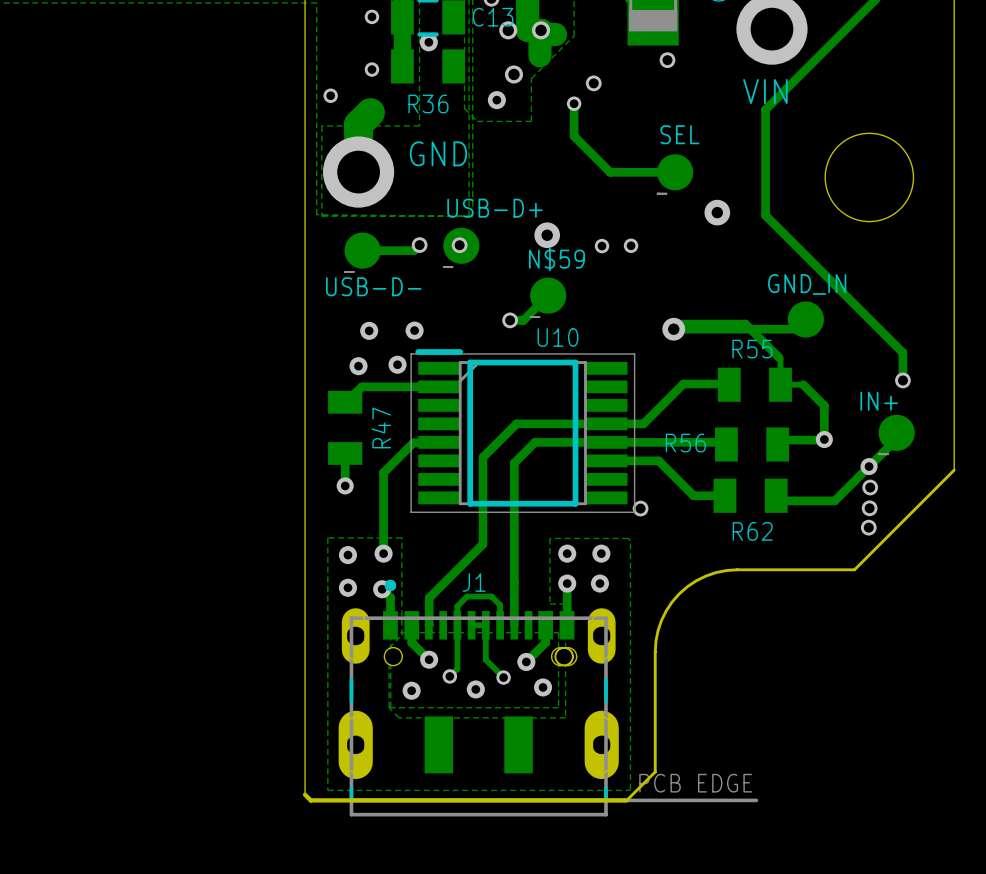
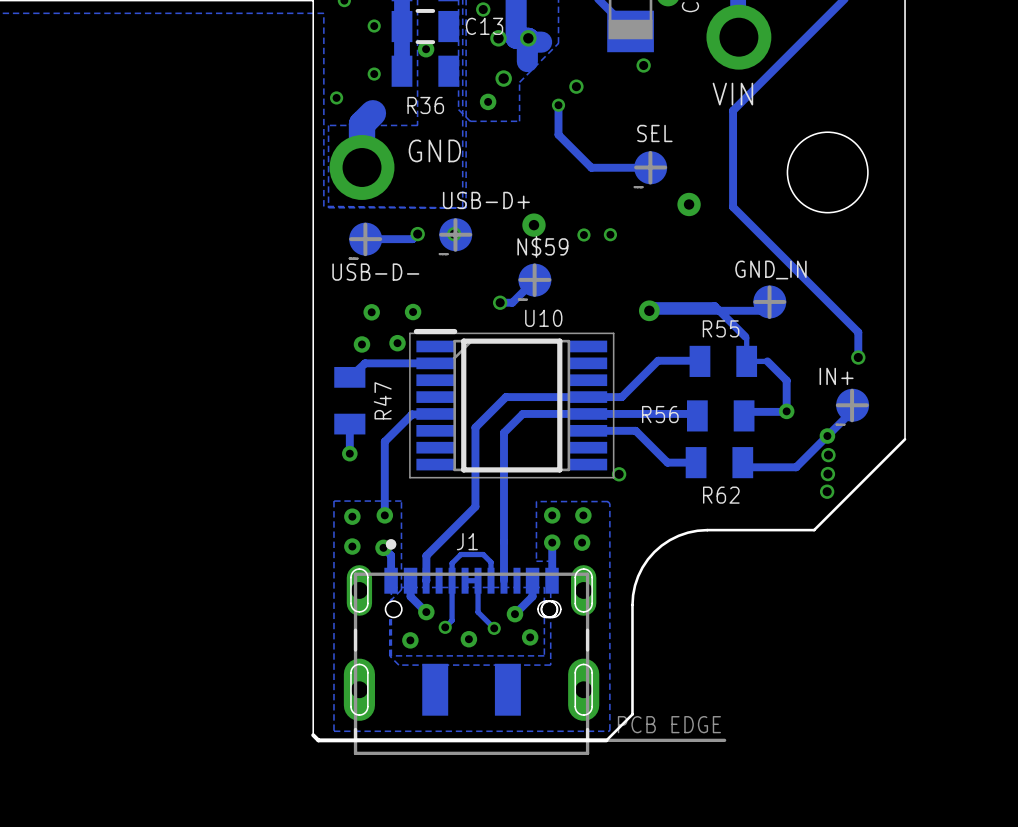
line: none -> (650, 152) (650, 182)
line: none -> (665, 167) (636, 167)
line: none -> (455, 220) (455, 249)
line: none -> (365, 224) (365, 254)
line: none -> (470, 234) (441, 234)
line: none -> (380, 239) (351, 239)
line: none -> (534, 265) (534, 294)
line: none -> (549, 279) (520, 279)
line: none -> (769, 287) (769, 317)
line: none -> (784, 301) (755, 301)
line: none -> (852, 390) (852, 420)
line: none -> (866, 405) (837, 405)

